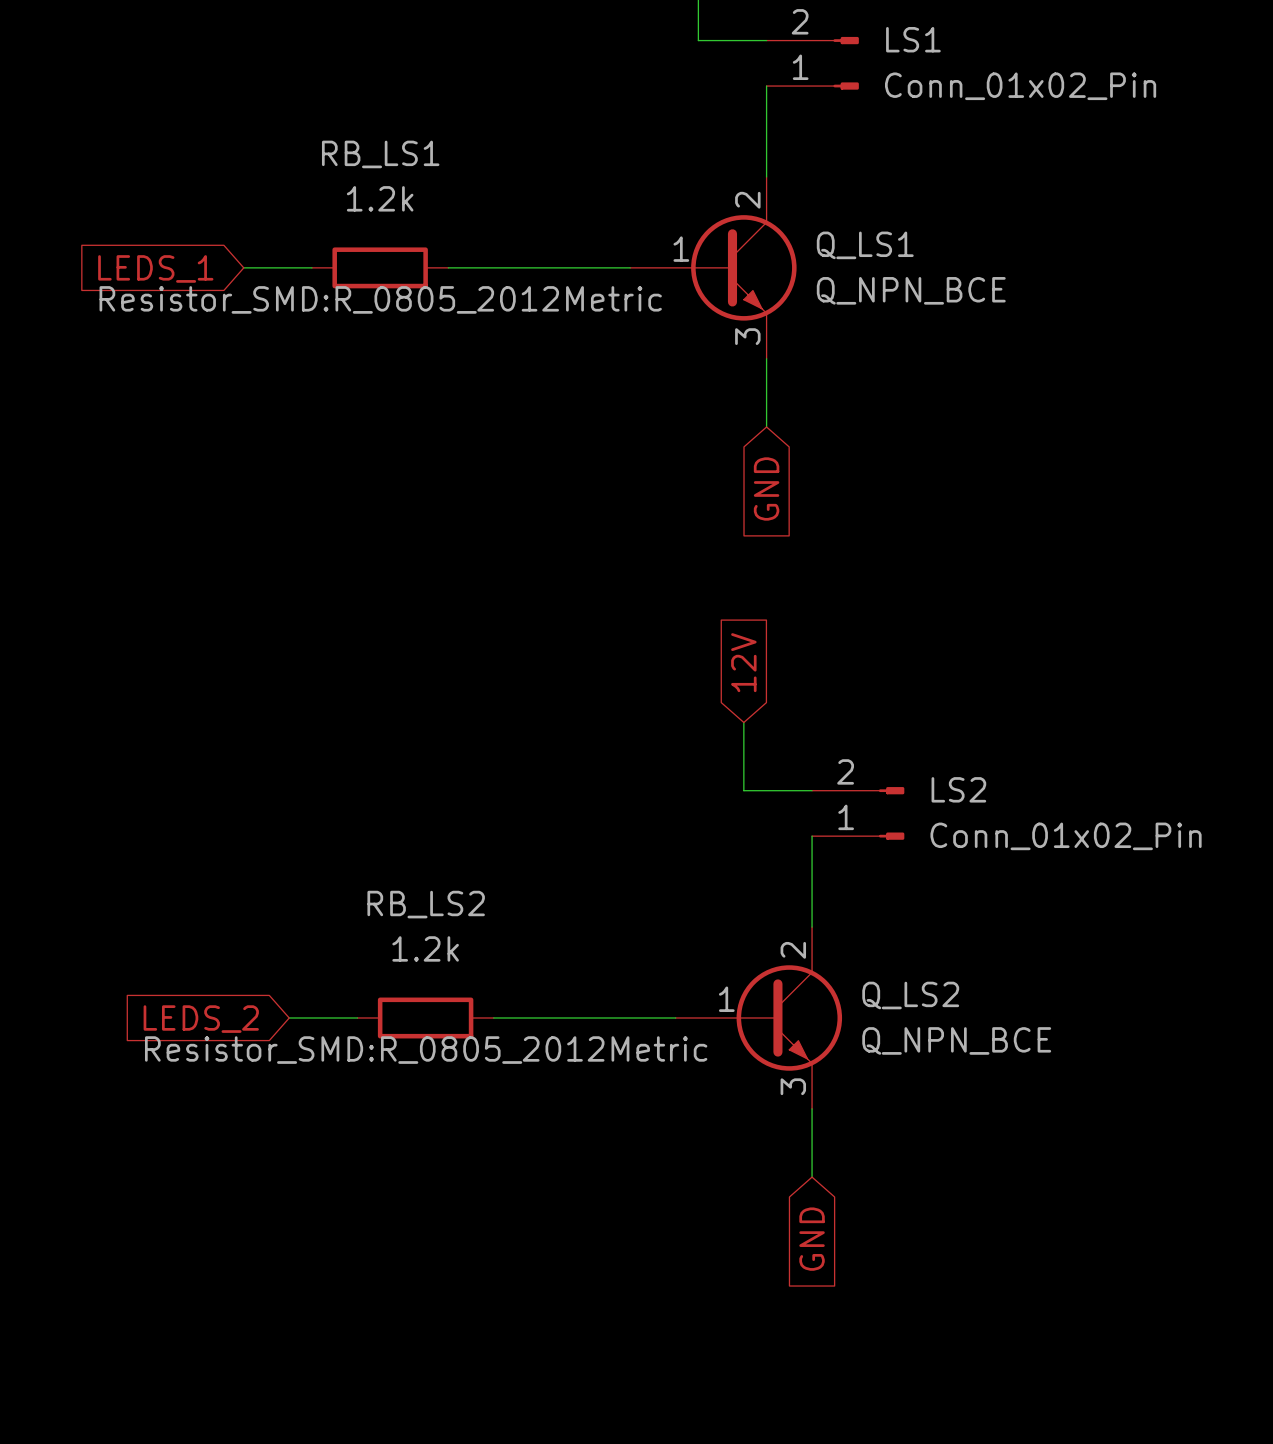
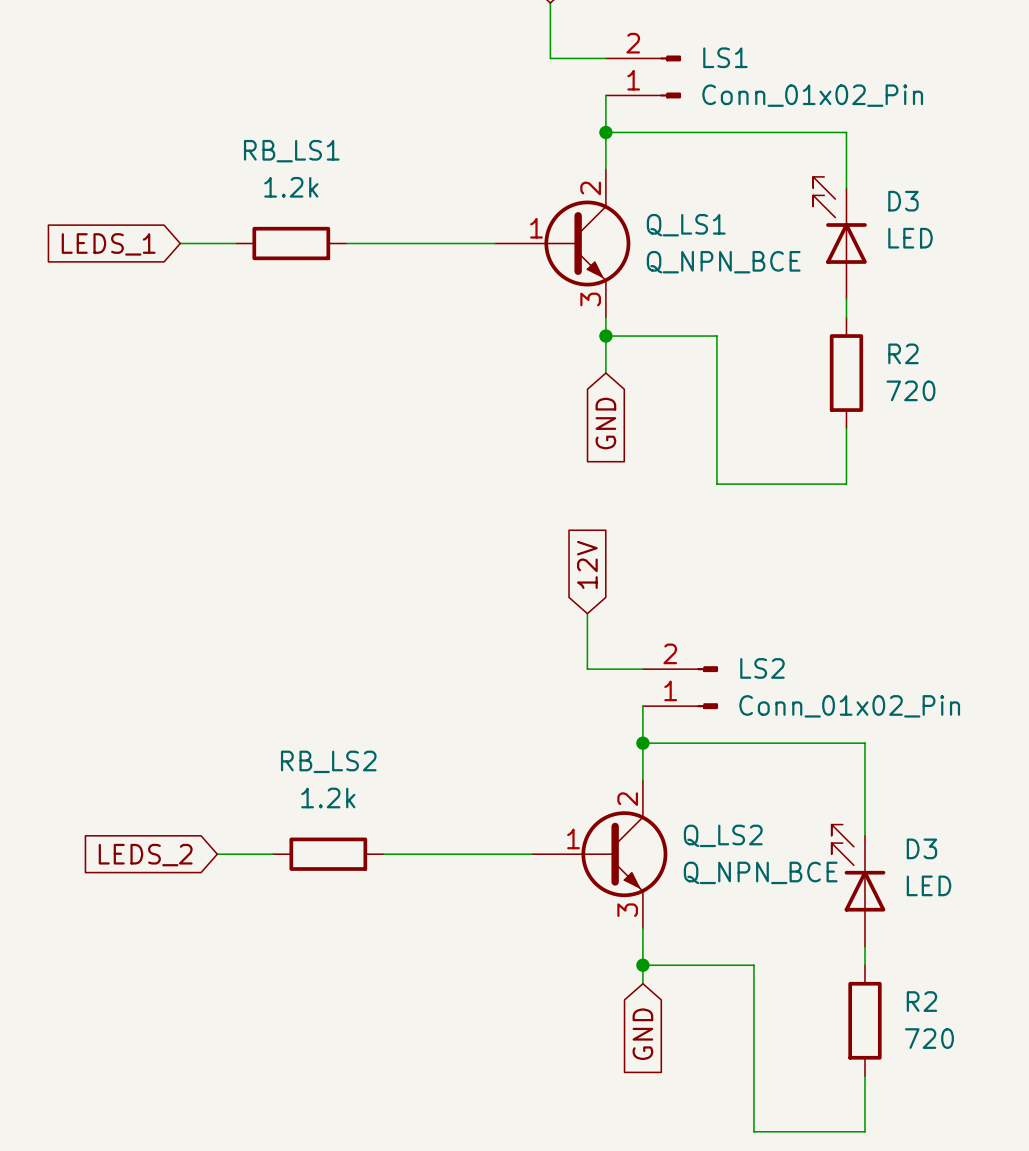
wire: none -> (605, 132) (846, 132) (846, 187)
junction: none -> (605, 132)
D3: none -> LED (840, 237)
RB_LS1 text: Resistor_SMD:R_0805_2012Metric (380, 299) -> none
wire: none -> (846, 299) (846, 317)
wire: none -> (605, 336) (716, 336) (716, 484) (846, 484) (846, 428)
junction: none -> (605, 336)
R2: none -> 720 (846, 373)
wire: none -> (642, 743) (864, 743) (864, 835)
junction: none -> (642, 743)
RB_LS2 text: Resistor_SMD:R_0805_2012Metric (426, 1050) -> none
D3: none -> LED (858, 885)
wire: none -> (864, 946) (864, 965)
wire: none -> (642, 965) (753, 965) (753, 1131) (864, 1131) (864, 1076)
junction: none -> (642, 965)
R2: none -> 720 (864, 1020)

